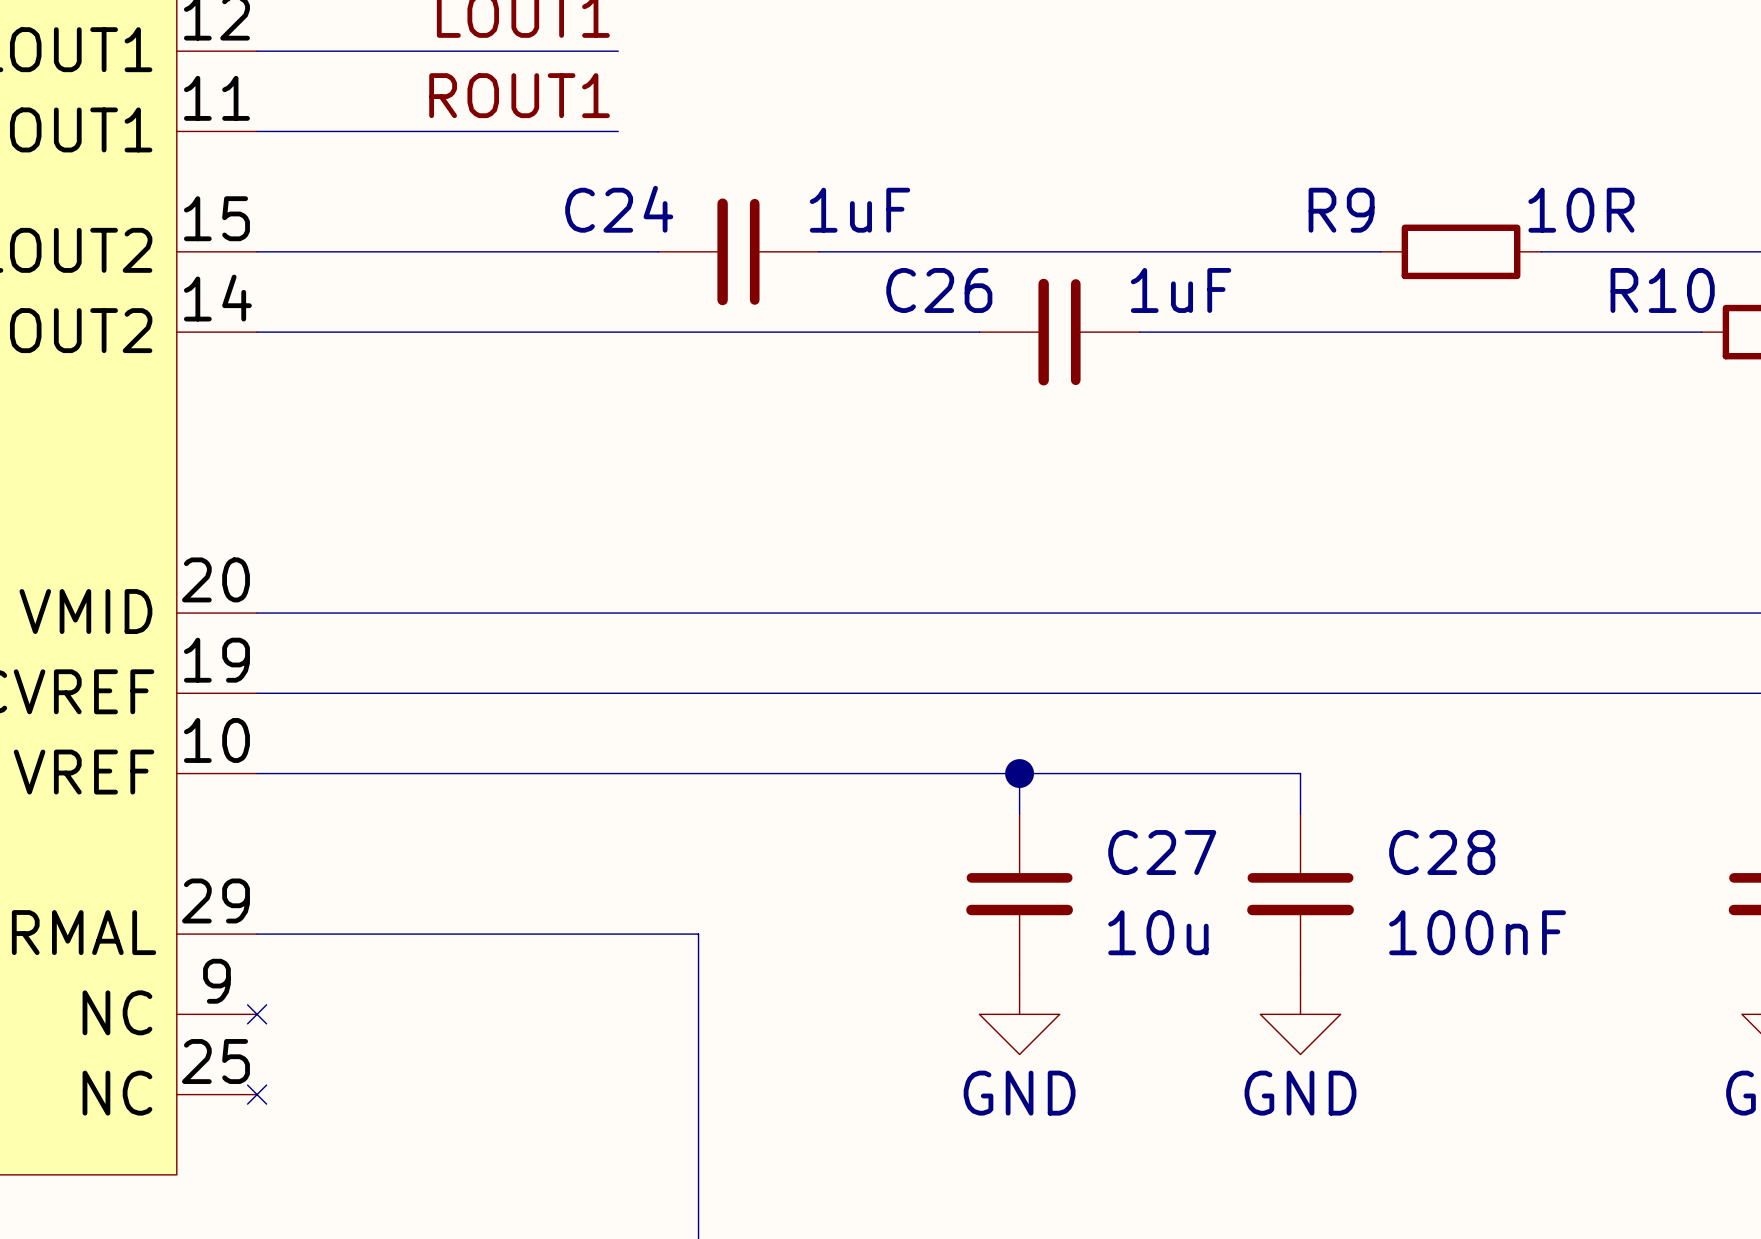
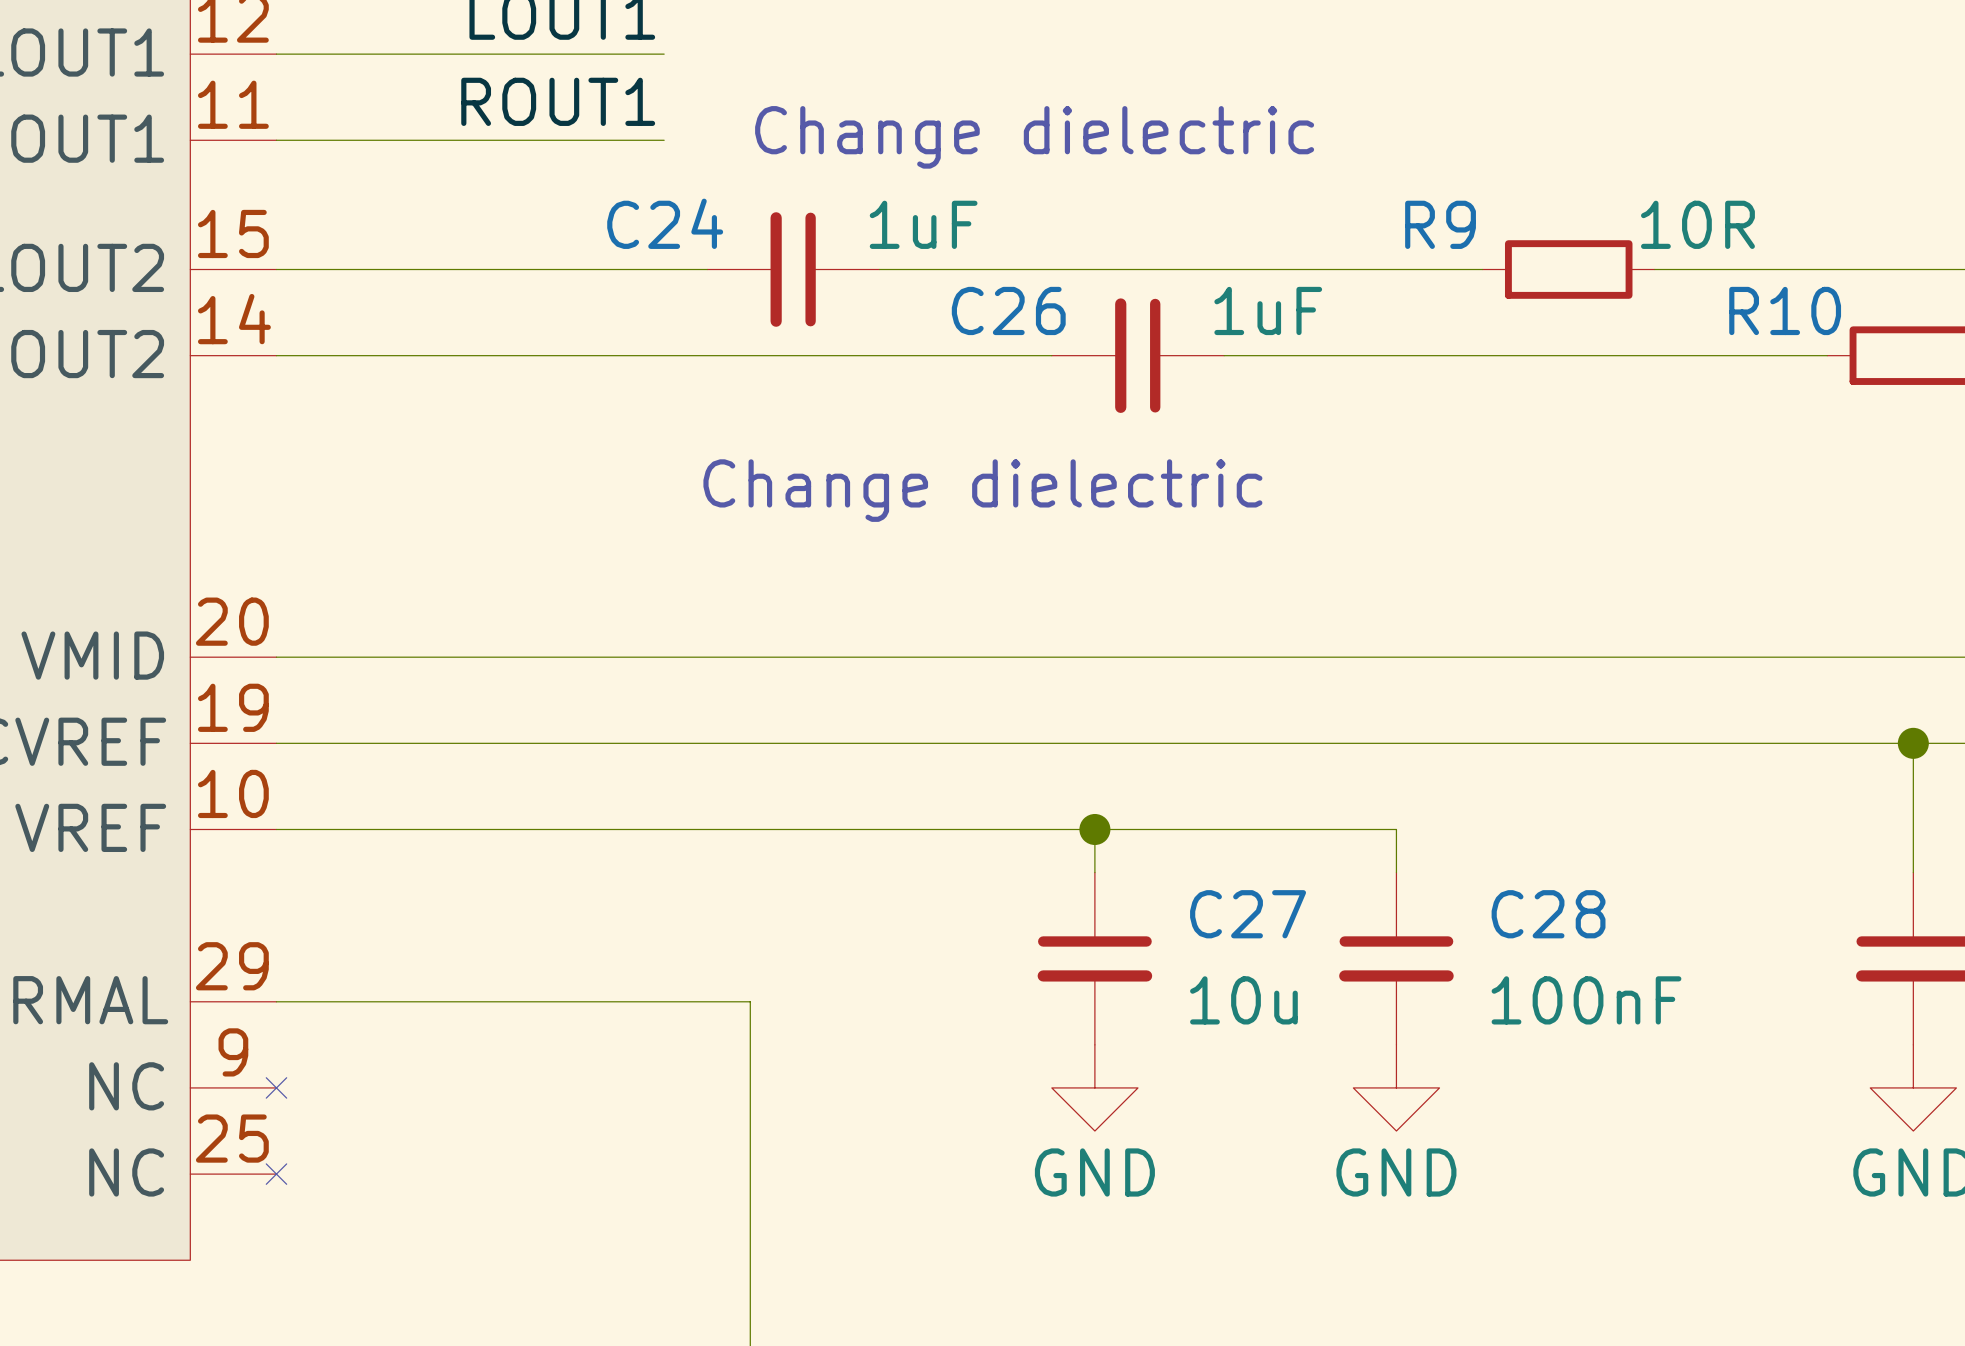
text: none -> Change dielectric (1034, 137)
text: none -> Change dielectric (982, 490)

